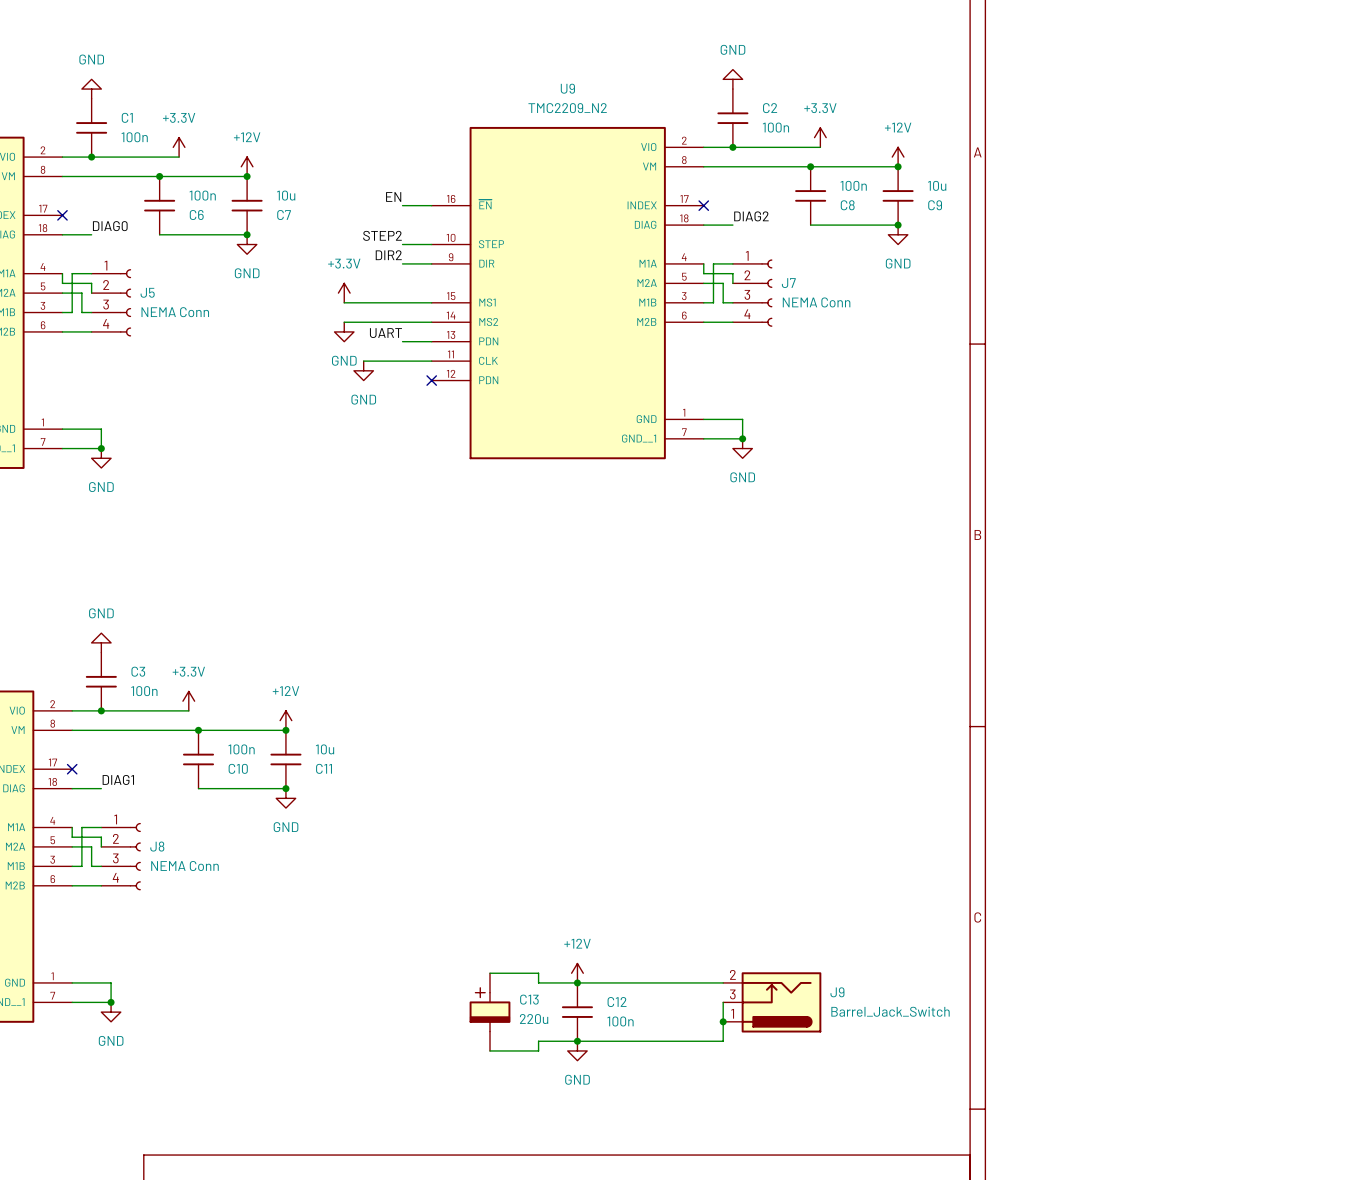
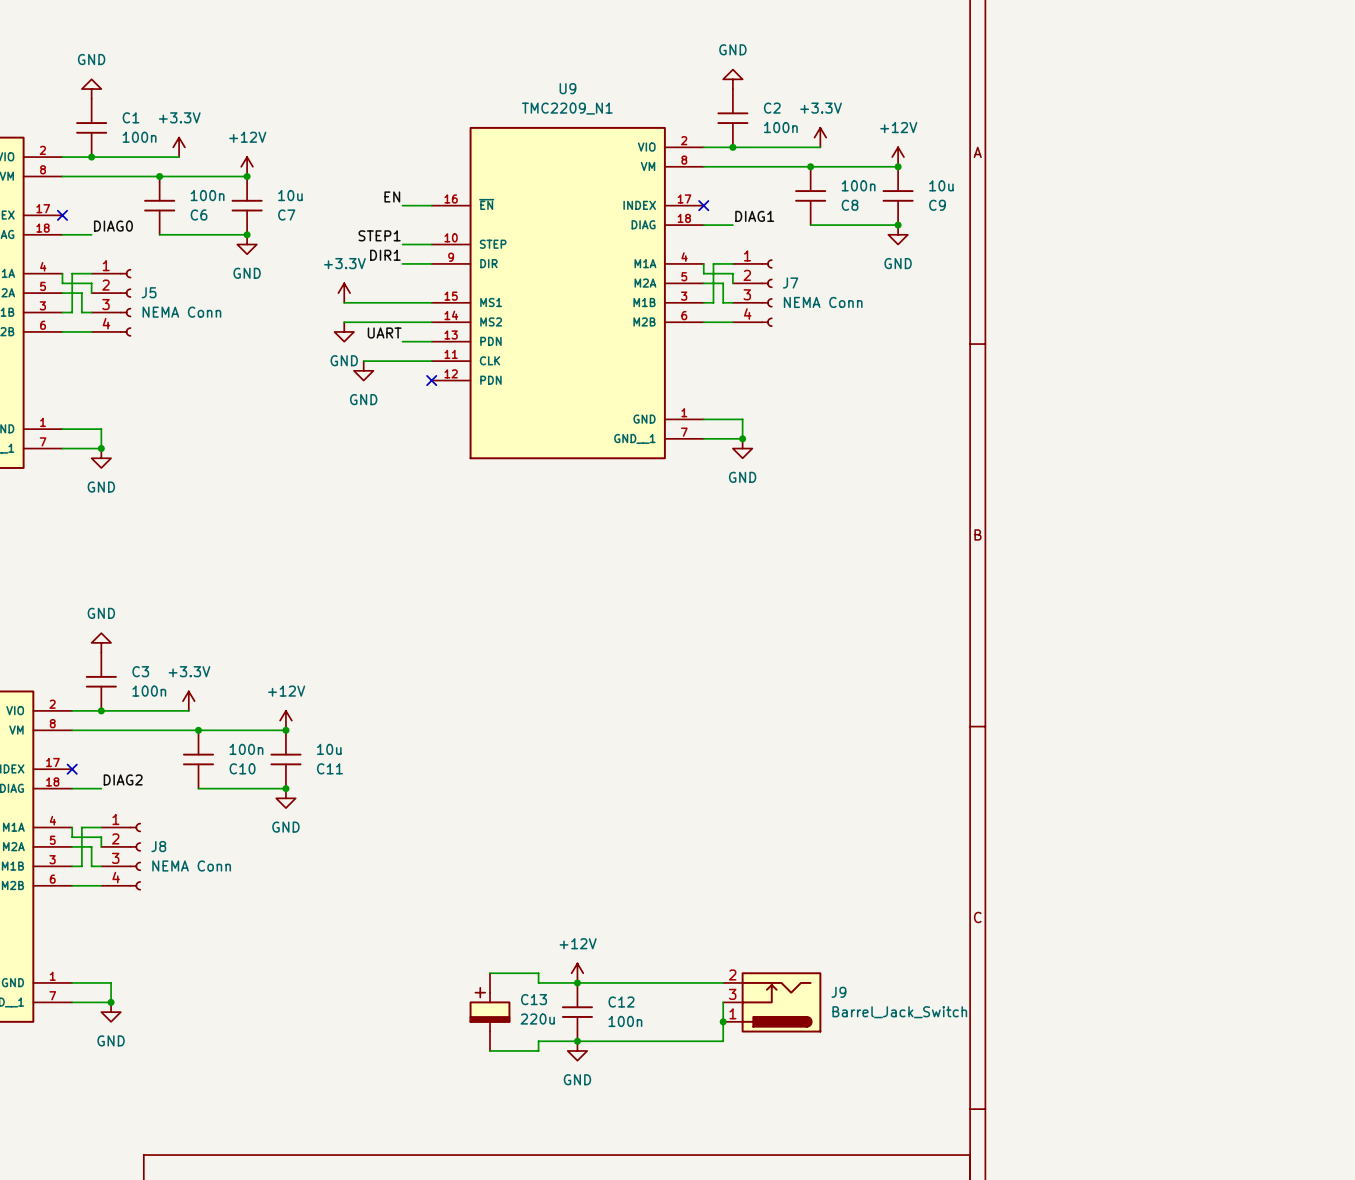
U9 value: TMC2209_N2 (567, 108) -> TMC2209_N1 (567, 108)
label: DIAG2 (751, 216) -> DIAG1 (754, 216)
label: STEP2 (382, 235) -> STEP1 (379, 235)
label: DIR2 (388, 255) -> DIR1 (385, 255)
label: DIAG1 (118, 779) -> DIAG2 (123, 779)

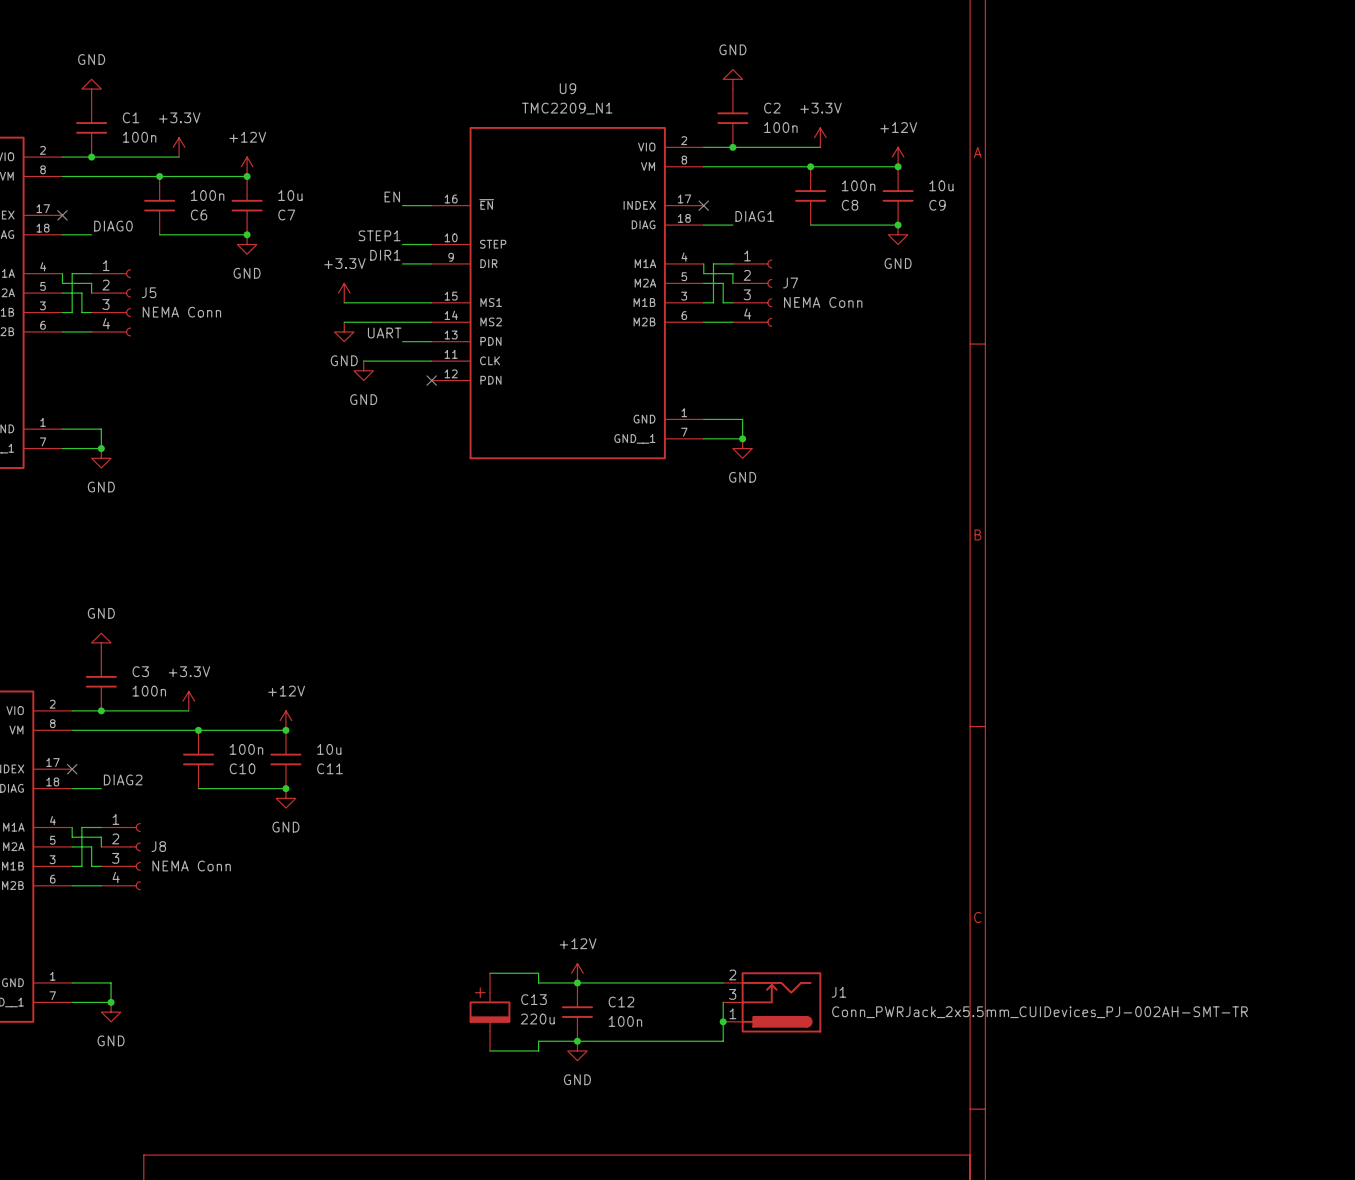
J9 name: J9 (838, 992) -> J1 (838, 992)
J9 value: Barrel_Jack_Switch (899, 1012) -> Conn_PWRJack_2x5.5mm_CUIDevices_PJ-002AH-SMT-TR (1039, 1012)

